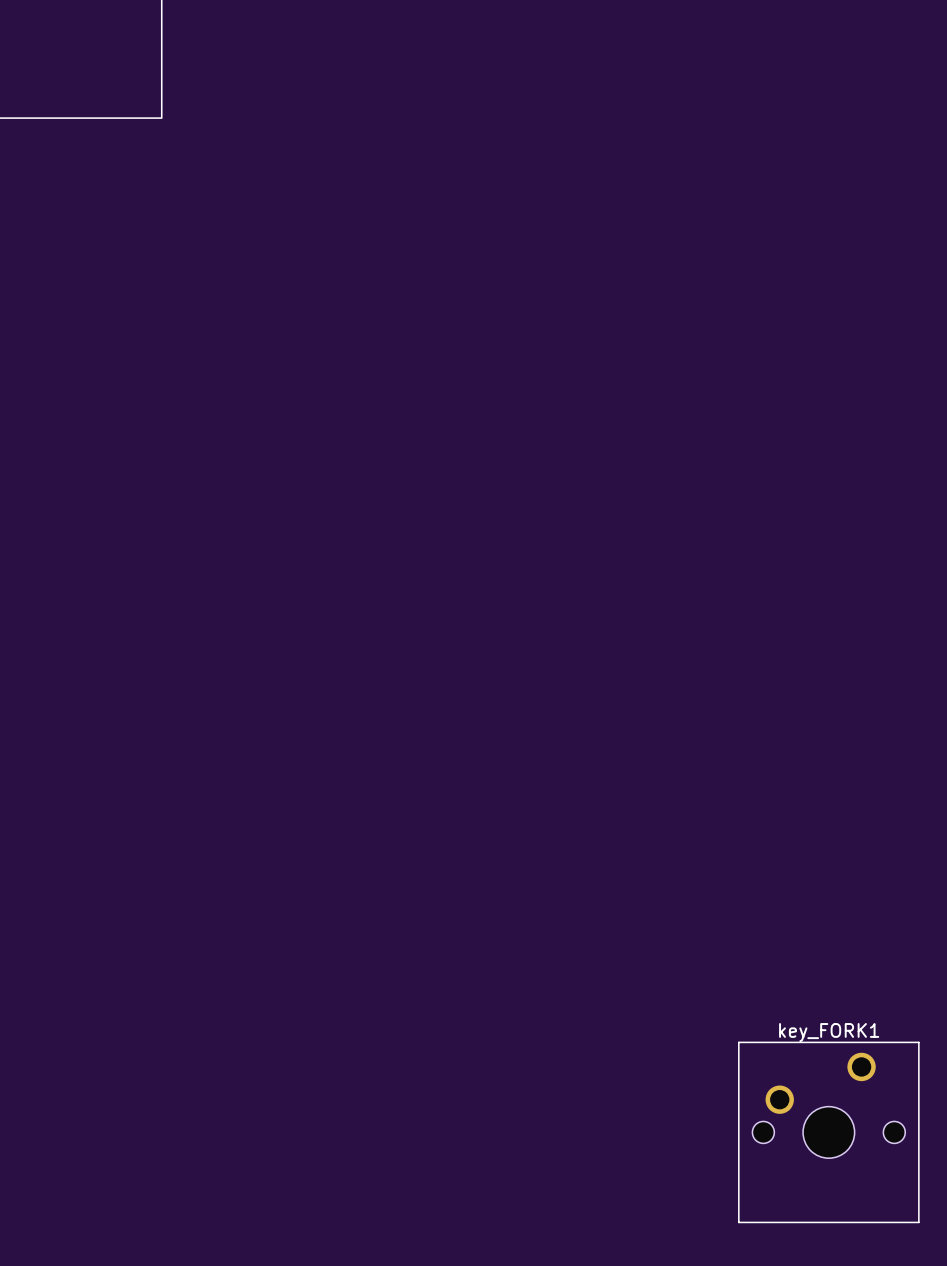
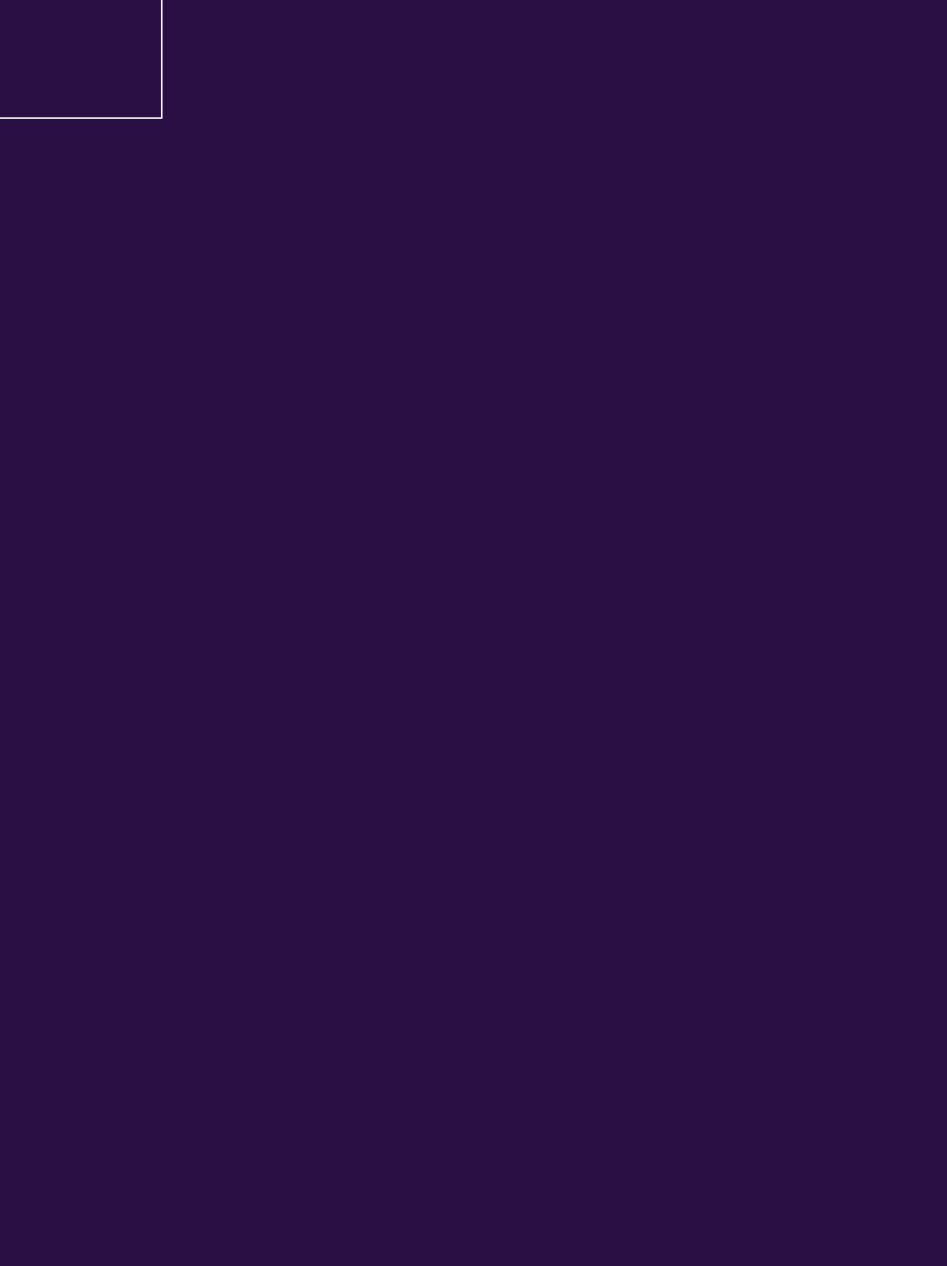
key_FORK1: (828, 1132) -> none

